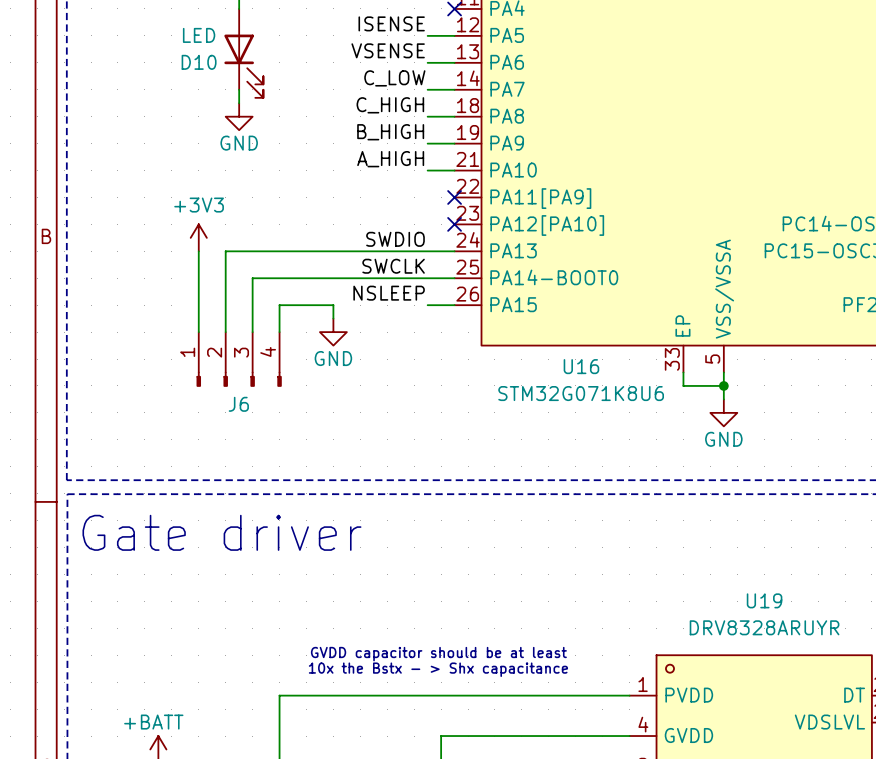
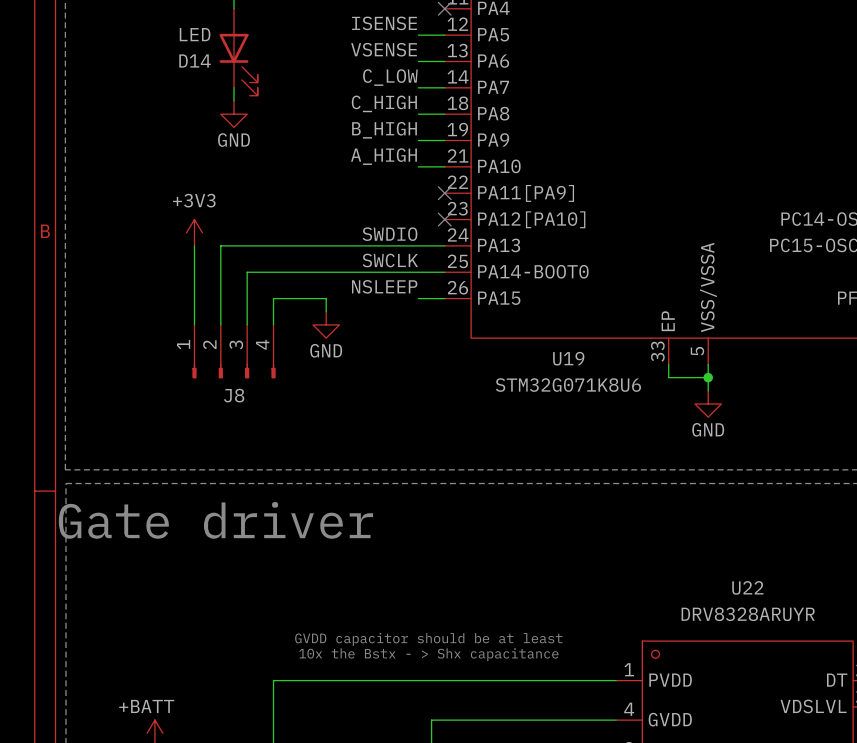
D10 name: D10 (199, 62) -> D14 (195, 60)
U16 name: U16 (581, 366) -> U19 (568, 358)
J6 name: J6 (238, 404) -> J8 (234, 395)
U19 name: U19 (764, 600) -> U22 (747, 587)

